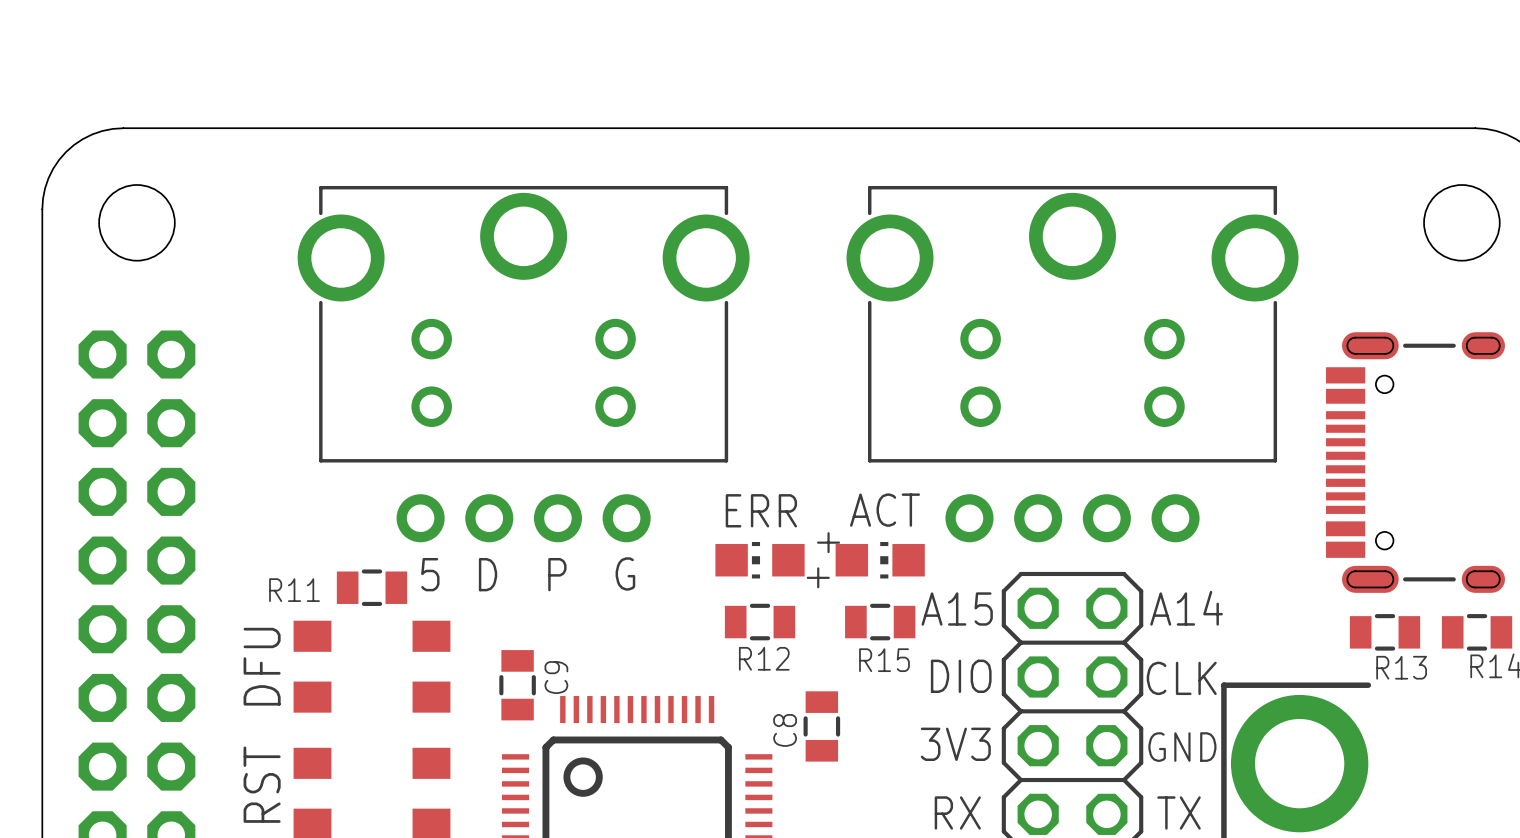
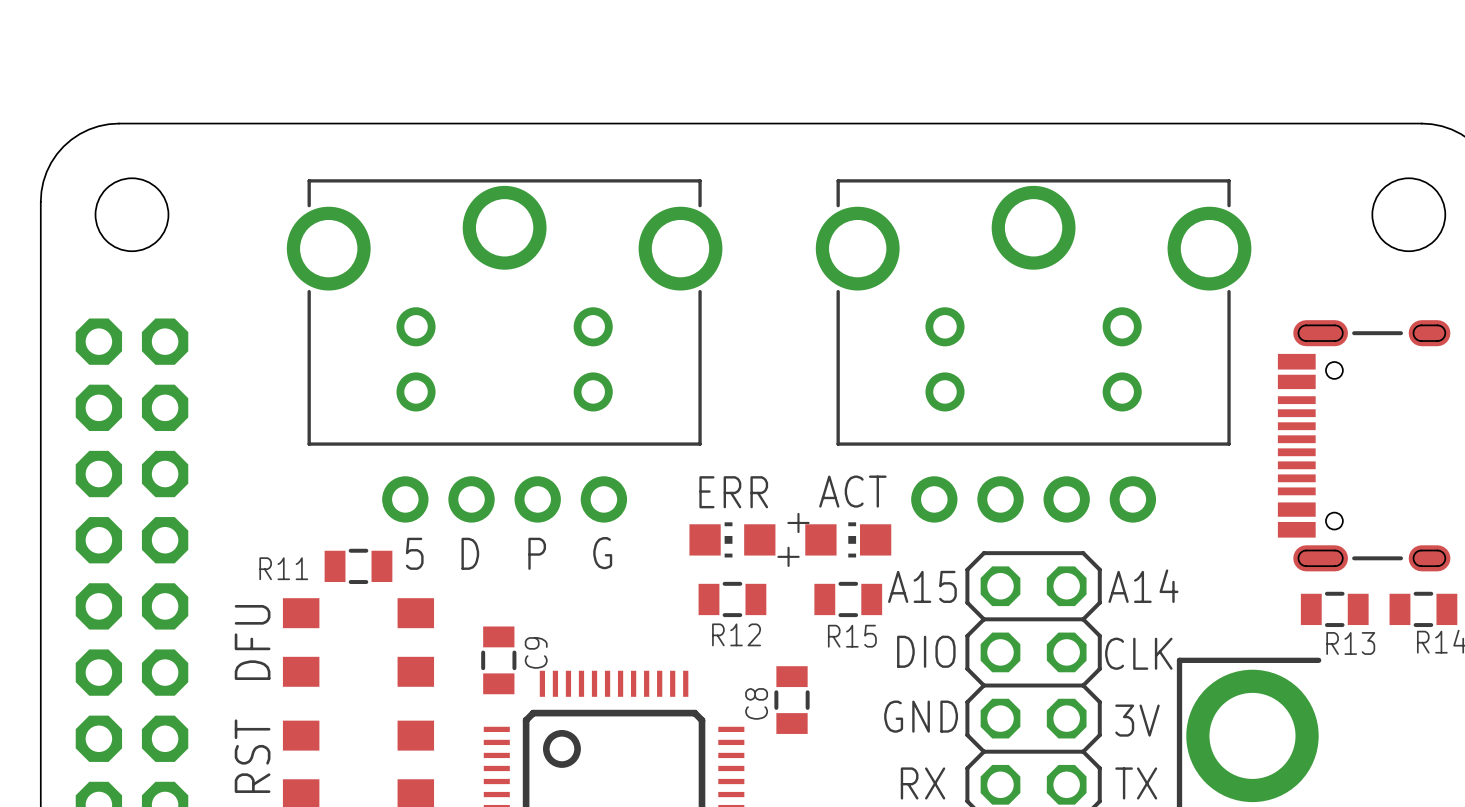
text: 3V3 (955, 744) -> GND (921, 716)
text: GND (1182, 747) -> 3V (1137, 720)

